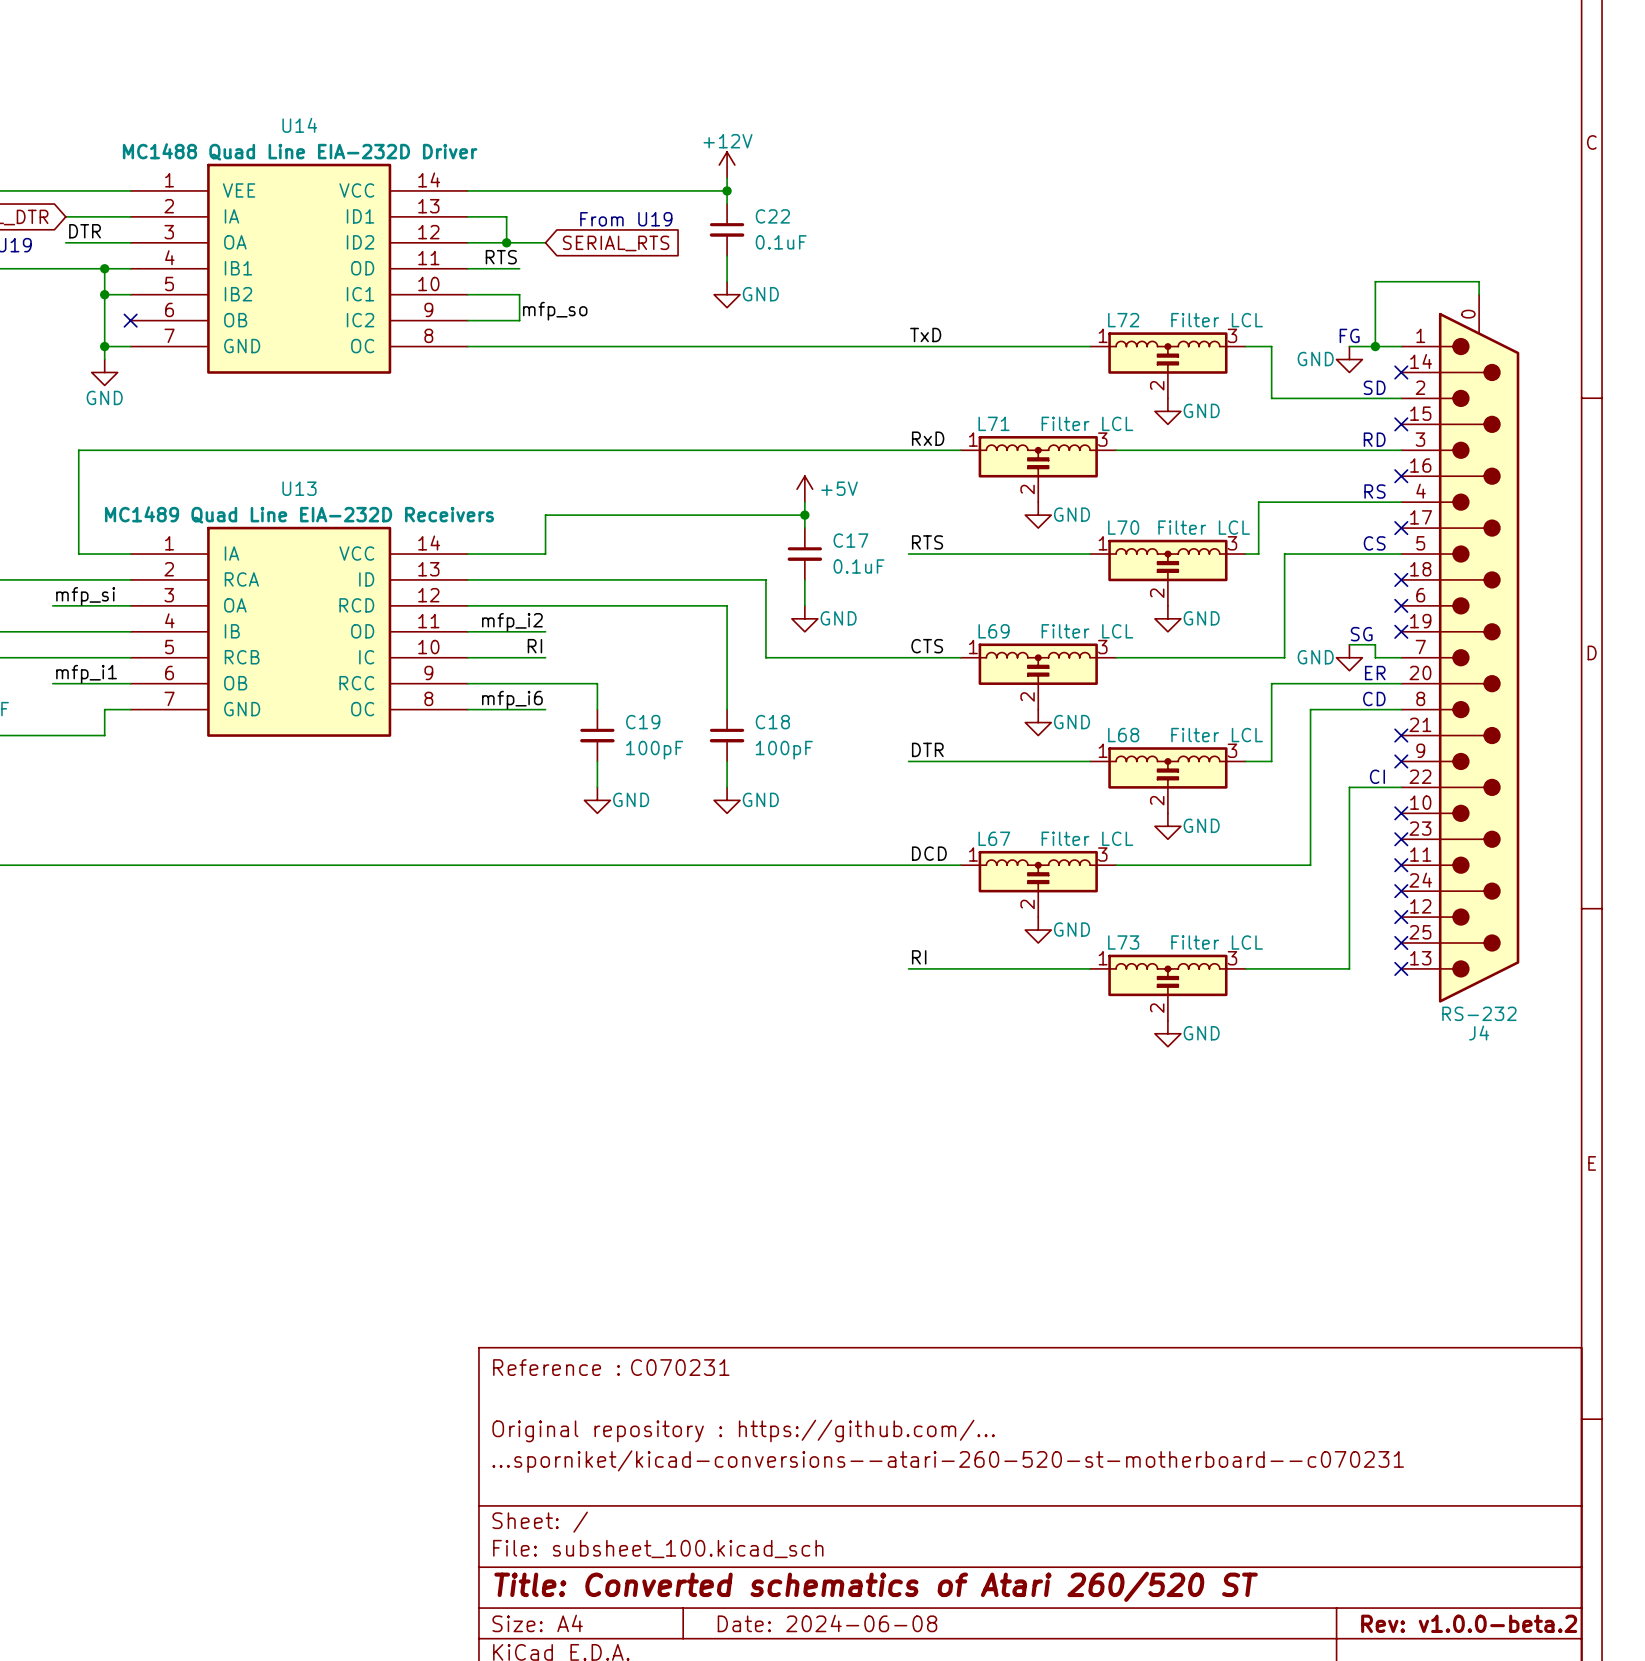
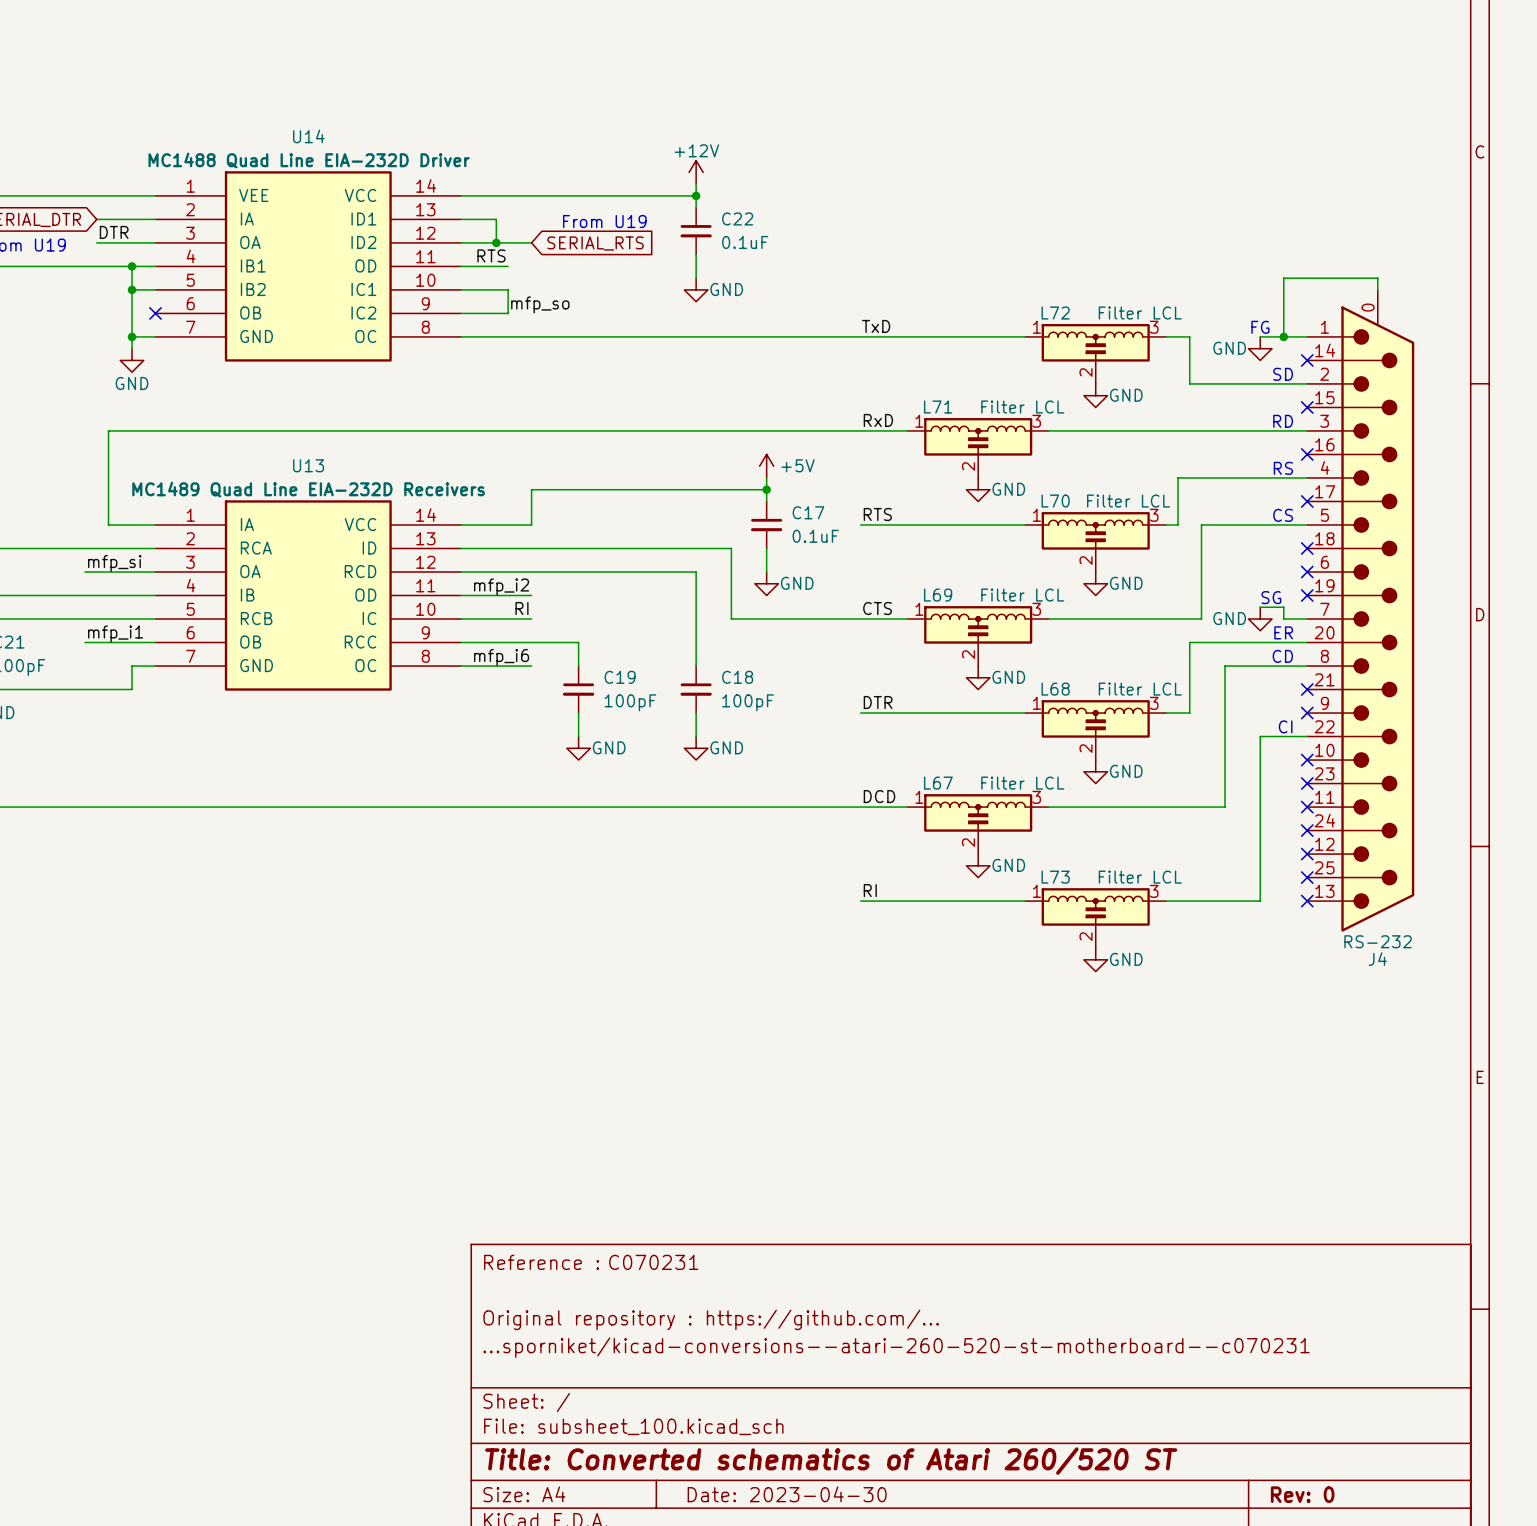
title block: Date: 2024-06-08 (827, 1623) -> Date: 2023-04-30 (787, 1494)
title block: Rev: v1.0.0-beta.2 (1469, 1623) -> Rev: 0 (1302, 1494)

